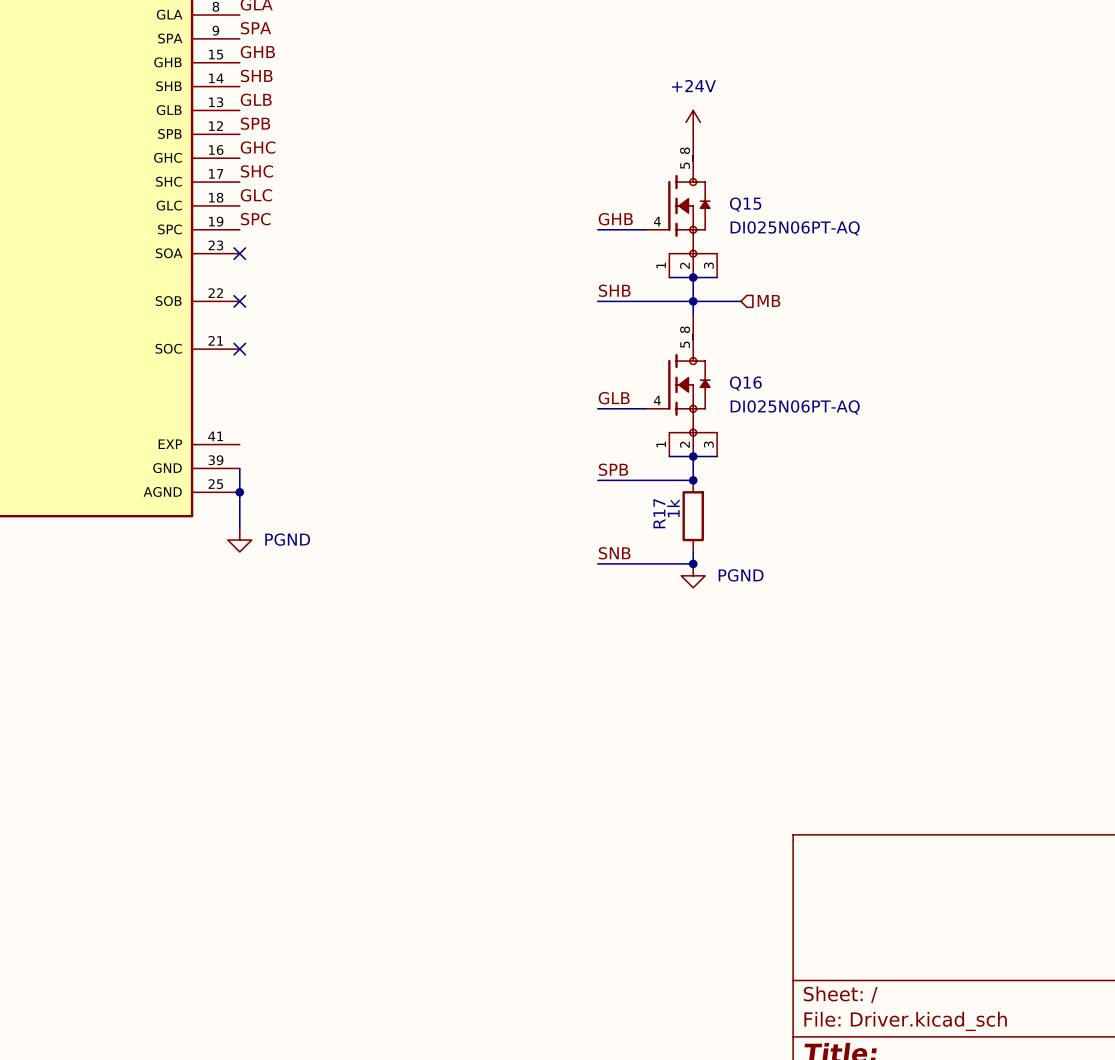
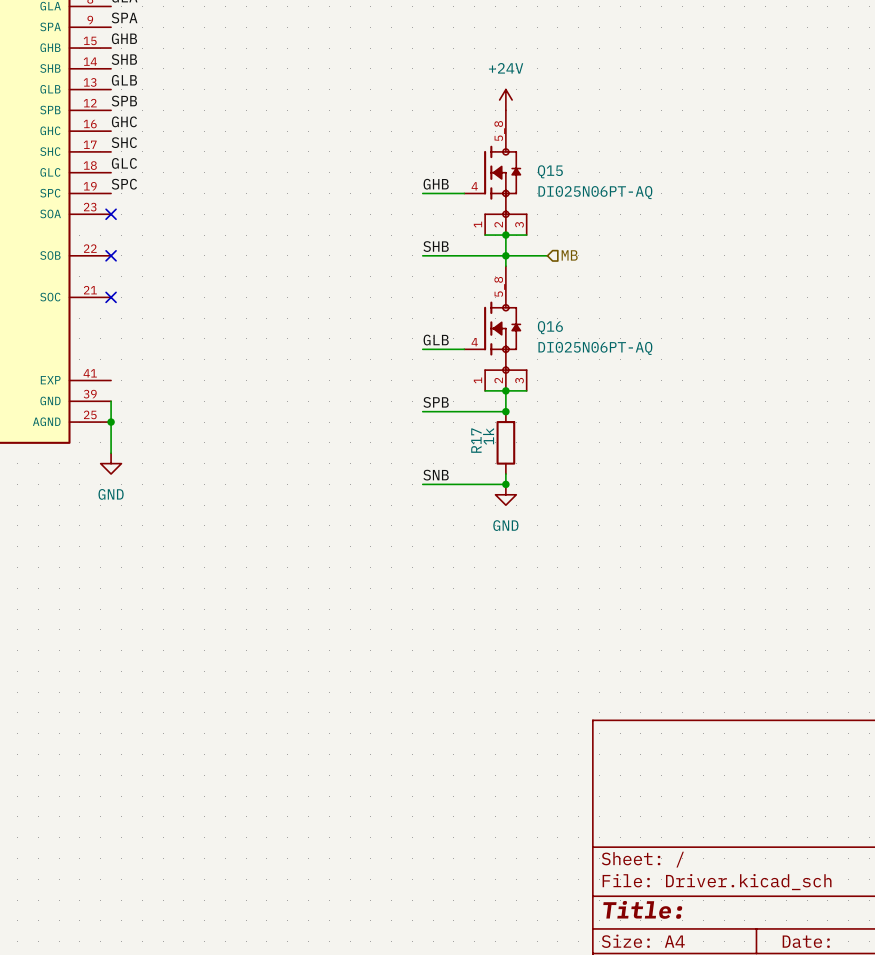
power symbol: PGND (239, 540) -> GND (111, 463)
power symbol: PGND (693, 575) -> GND (505, 494)

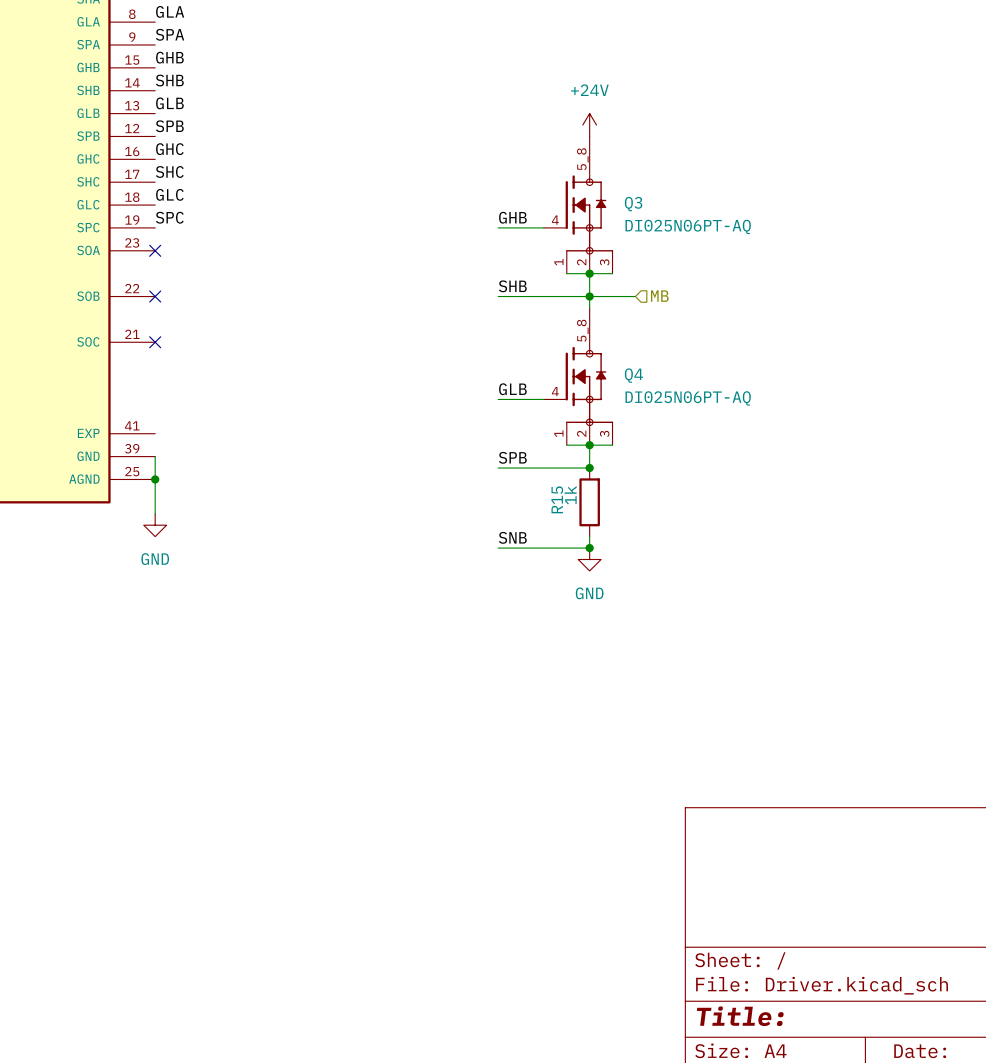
Q15 name: Q15 (550, 171) -> Q3 (633, 204)
Q16 name: Q16 (550, 327) -> Q4 (633, 375)
R17 name: R17 (476, 440) -> R15 (557, 499)

